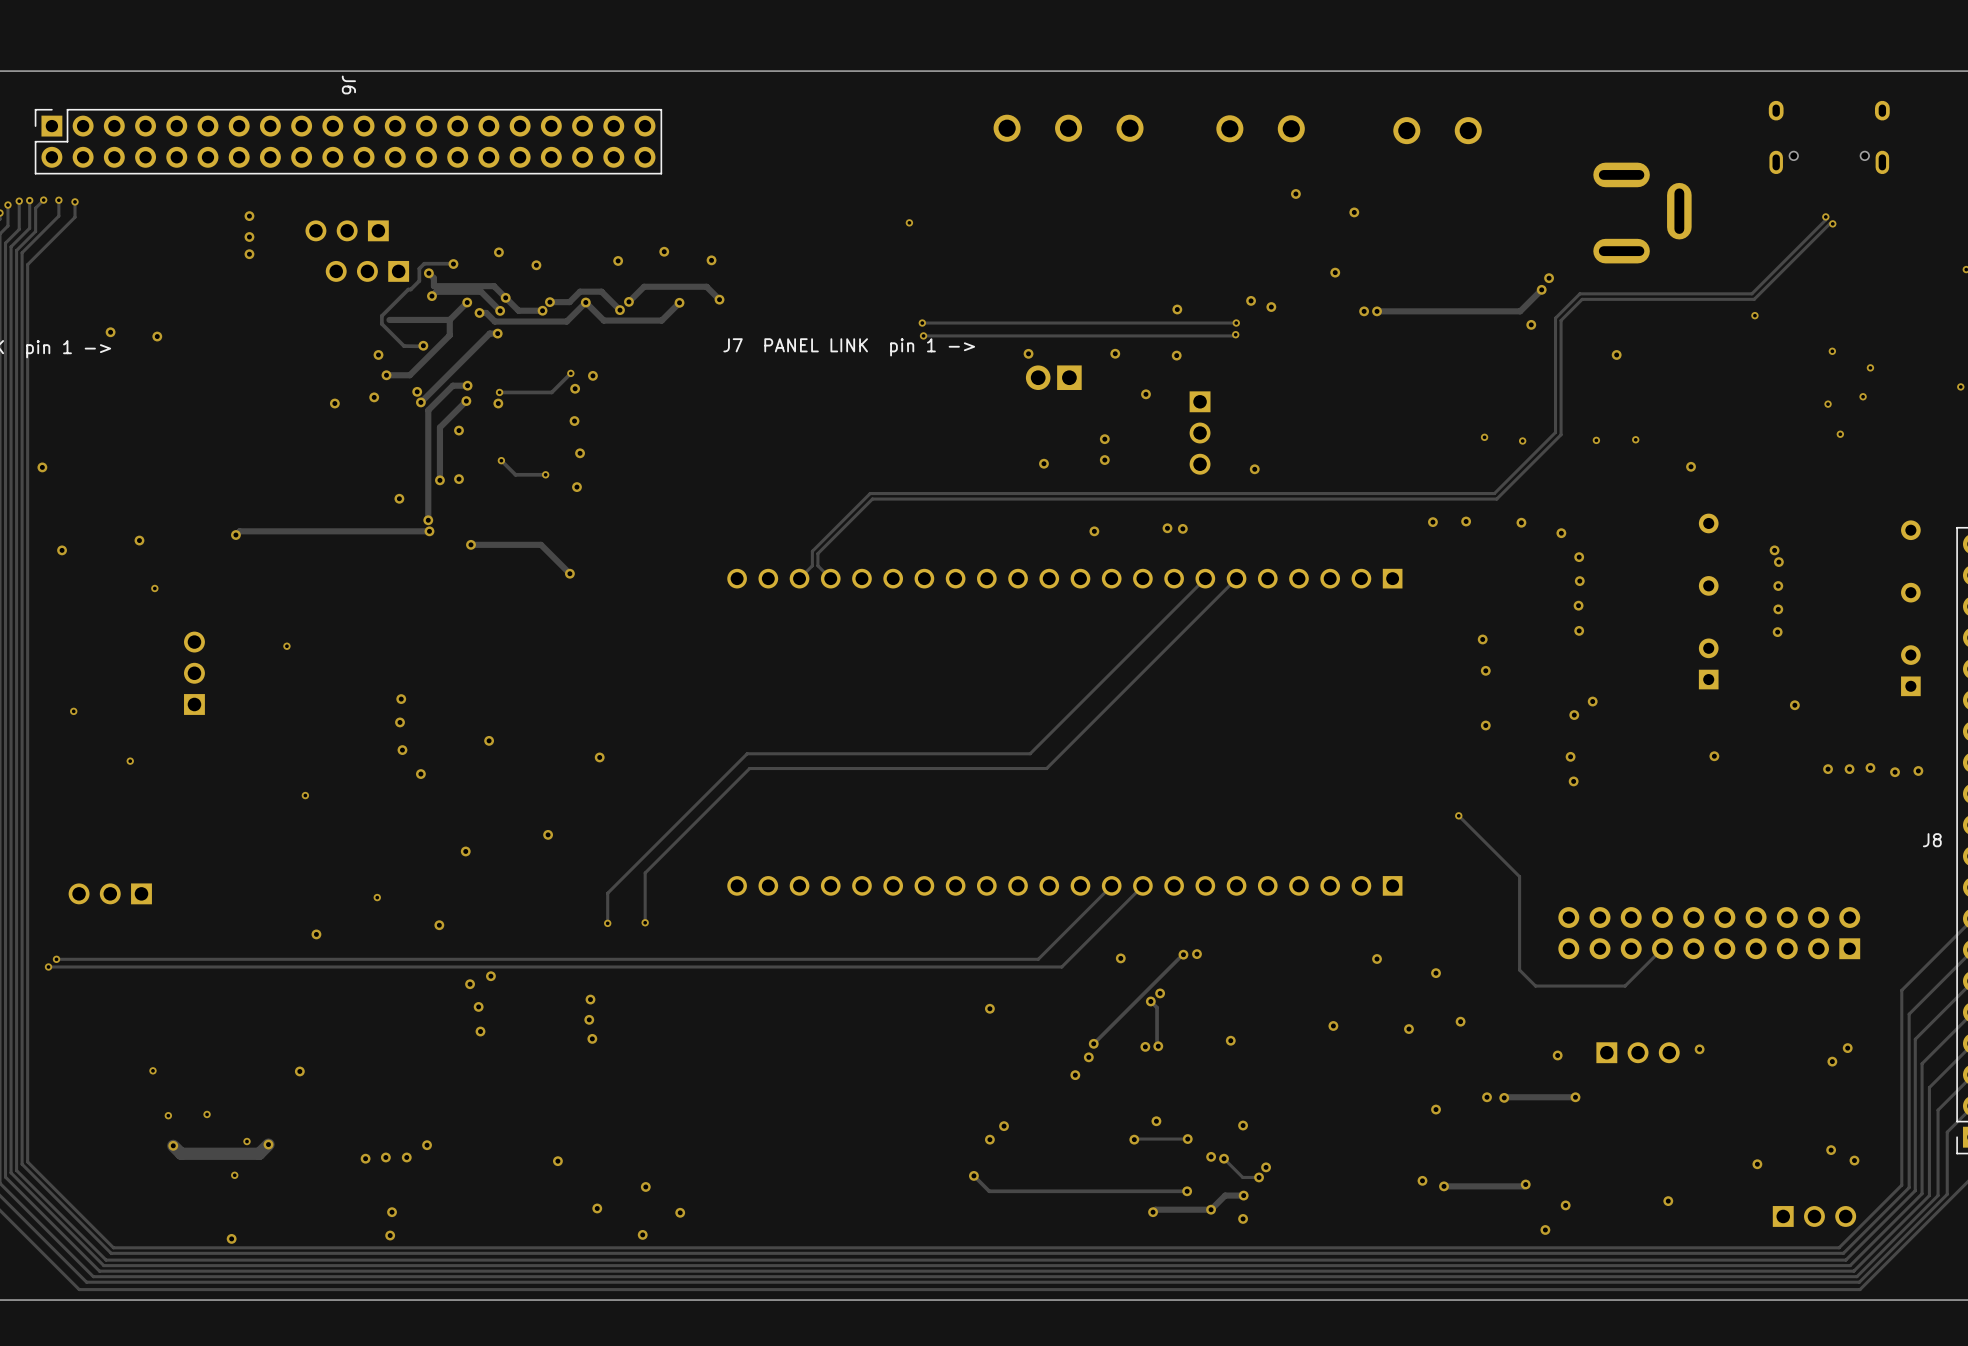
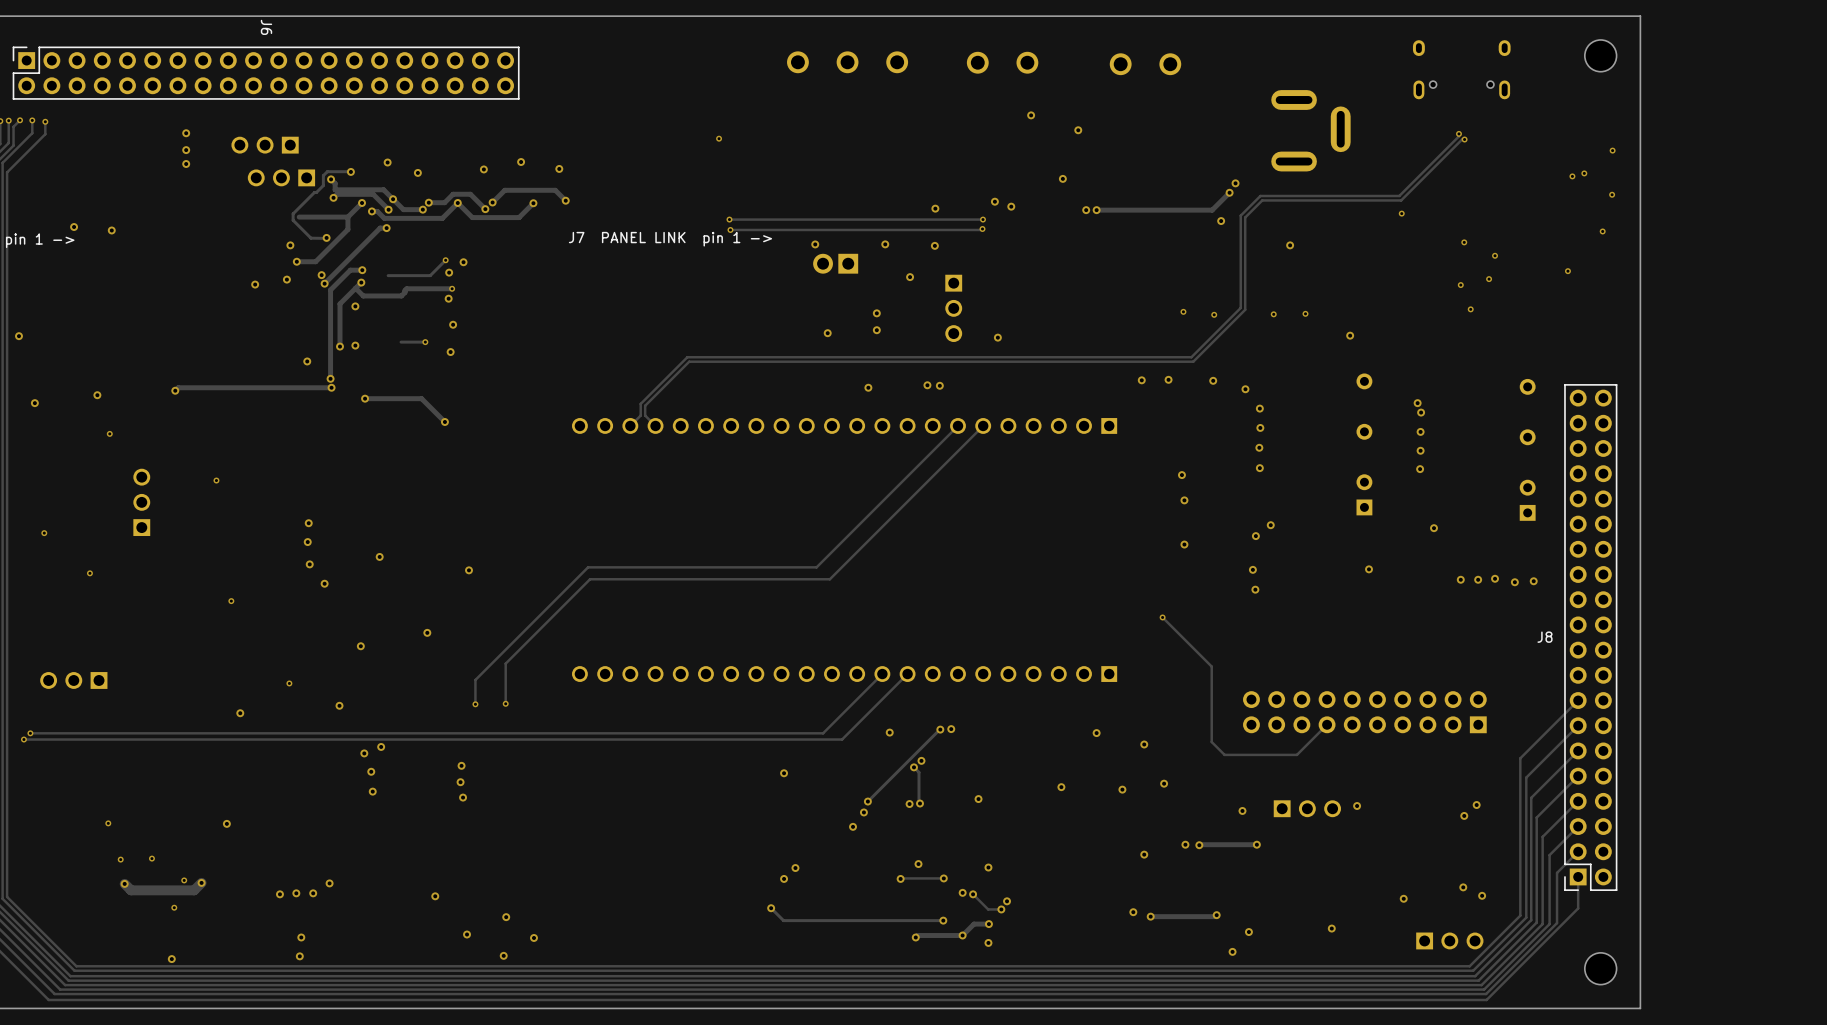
via: (499, 392) -> none
via: (498, 403) -> none
track: none -> (355, 288) (363, 295) (401, 295) (406, 288) (452, 288)
via: none -> (452, 288)
track: (501, 460) (515, 474) -> none
via: (501, 460) -> none

